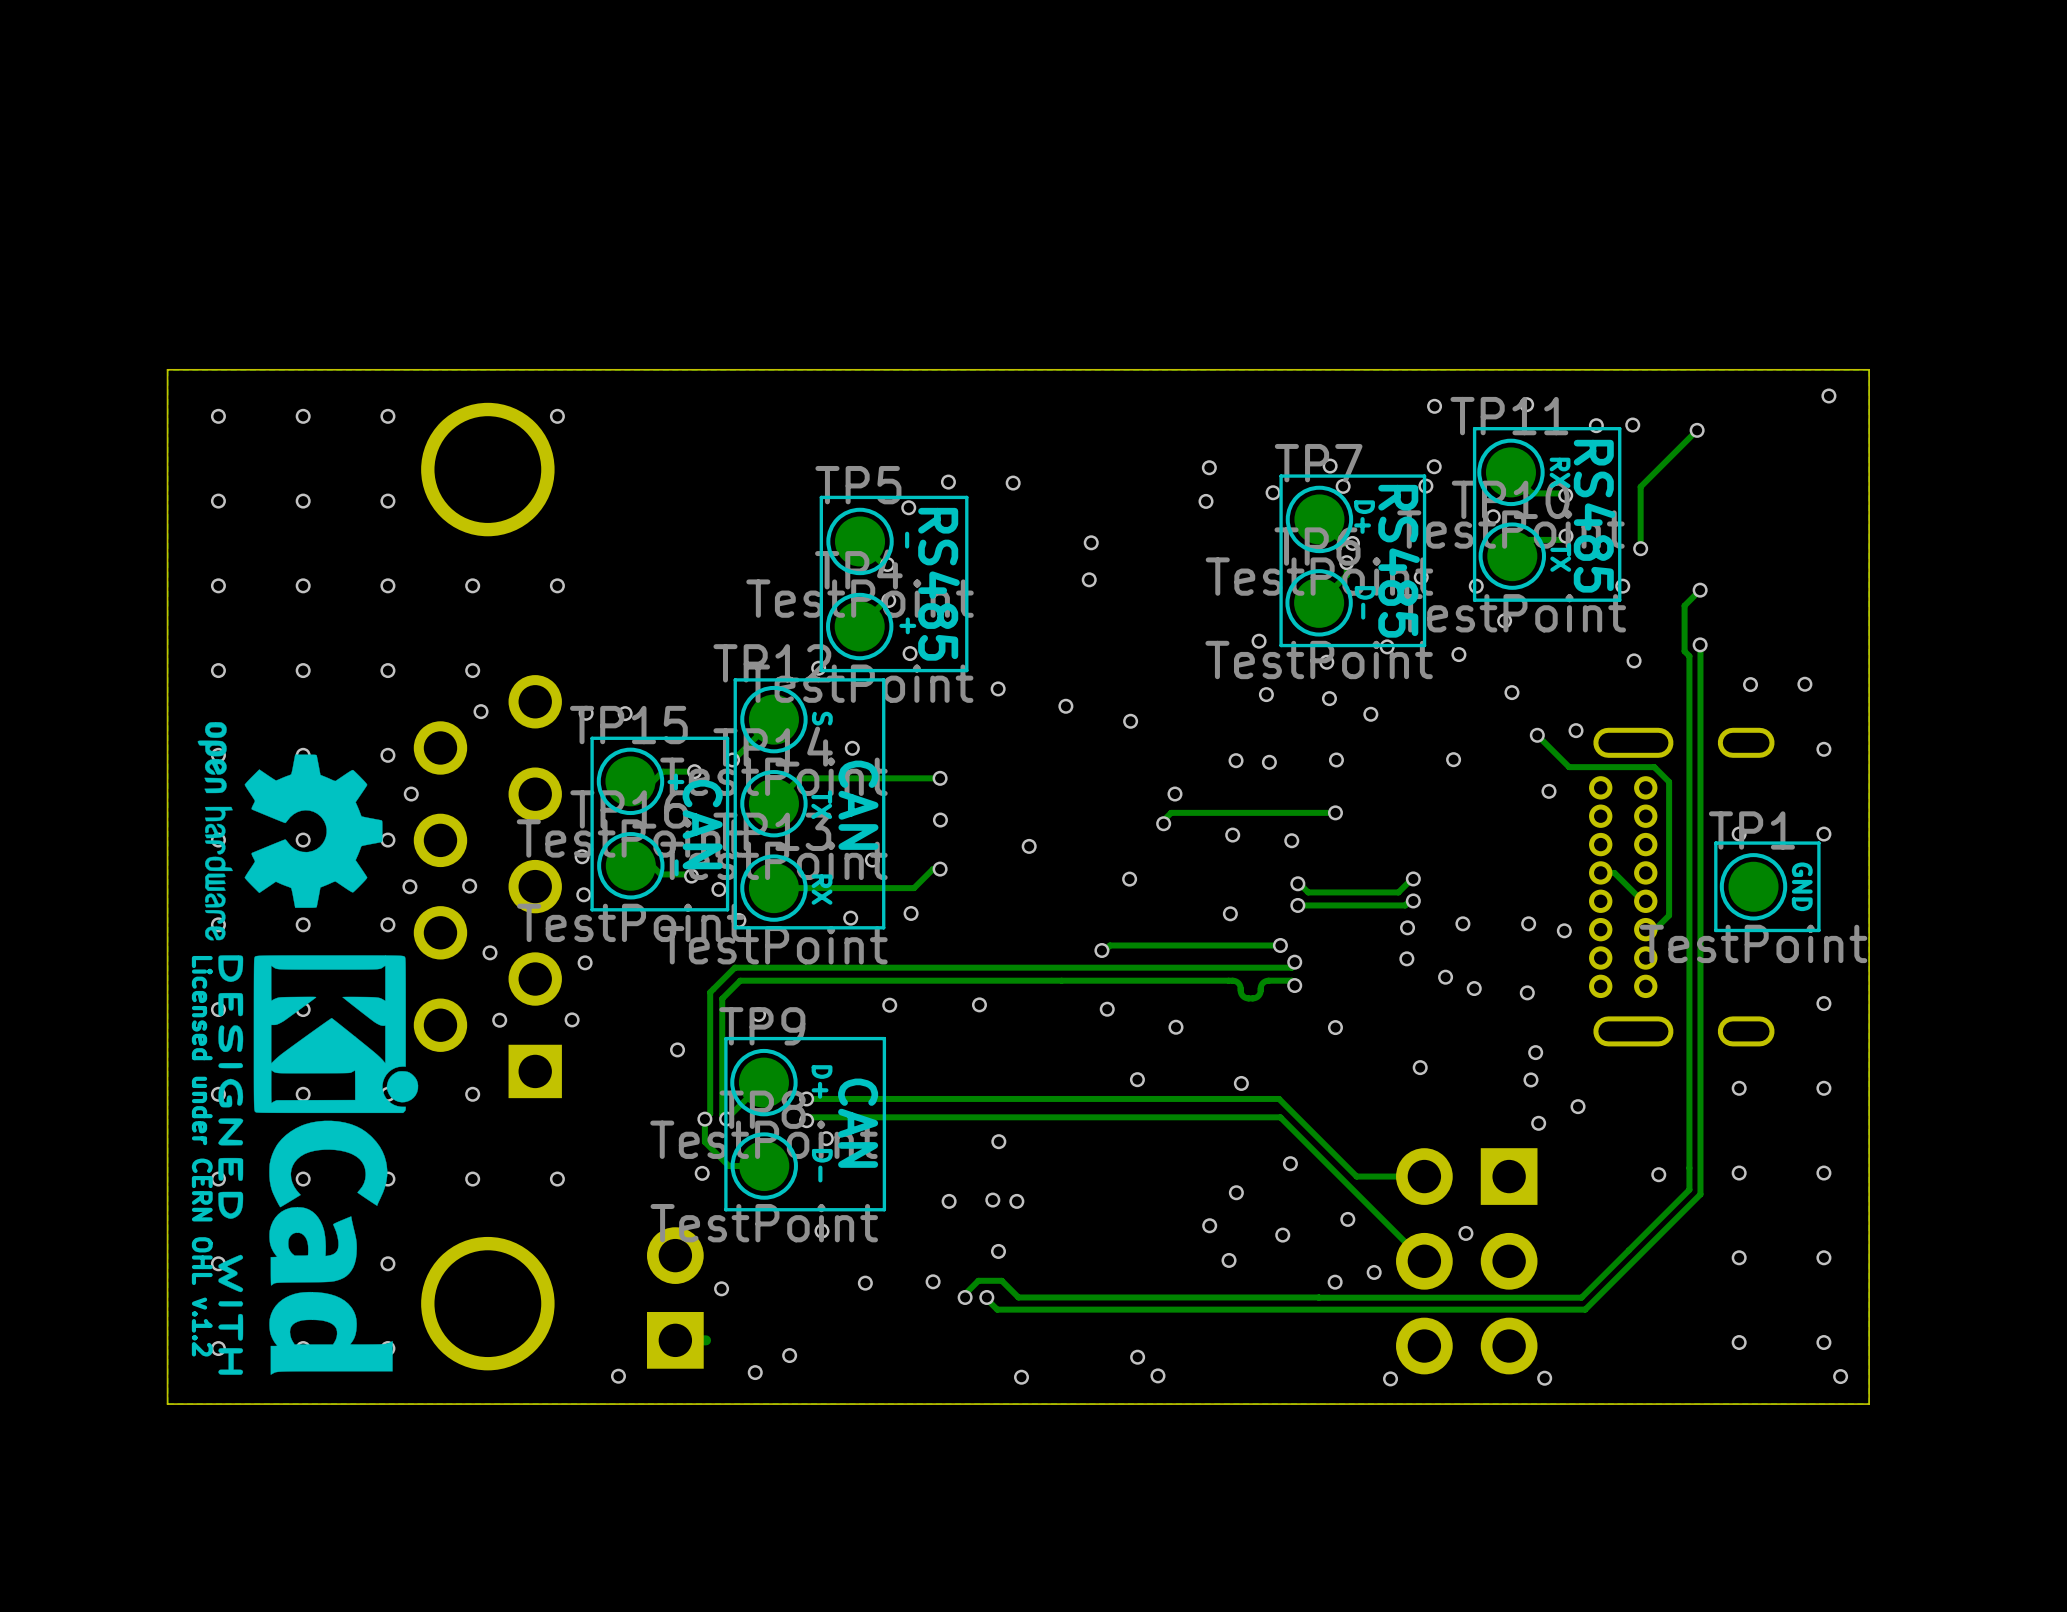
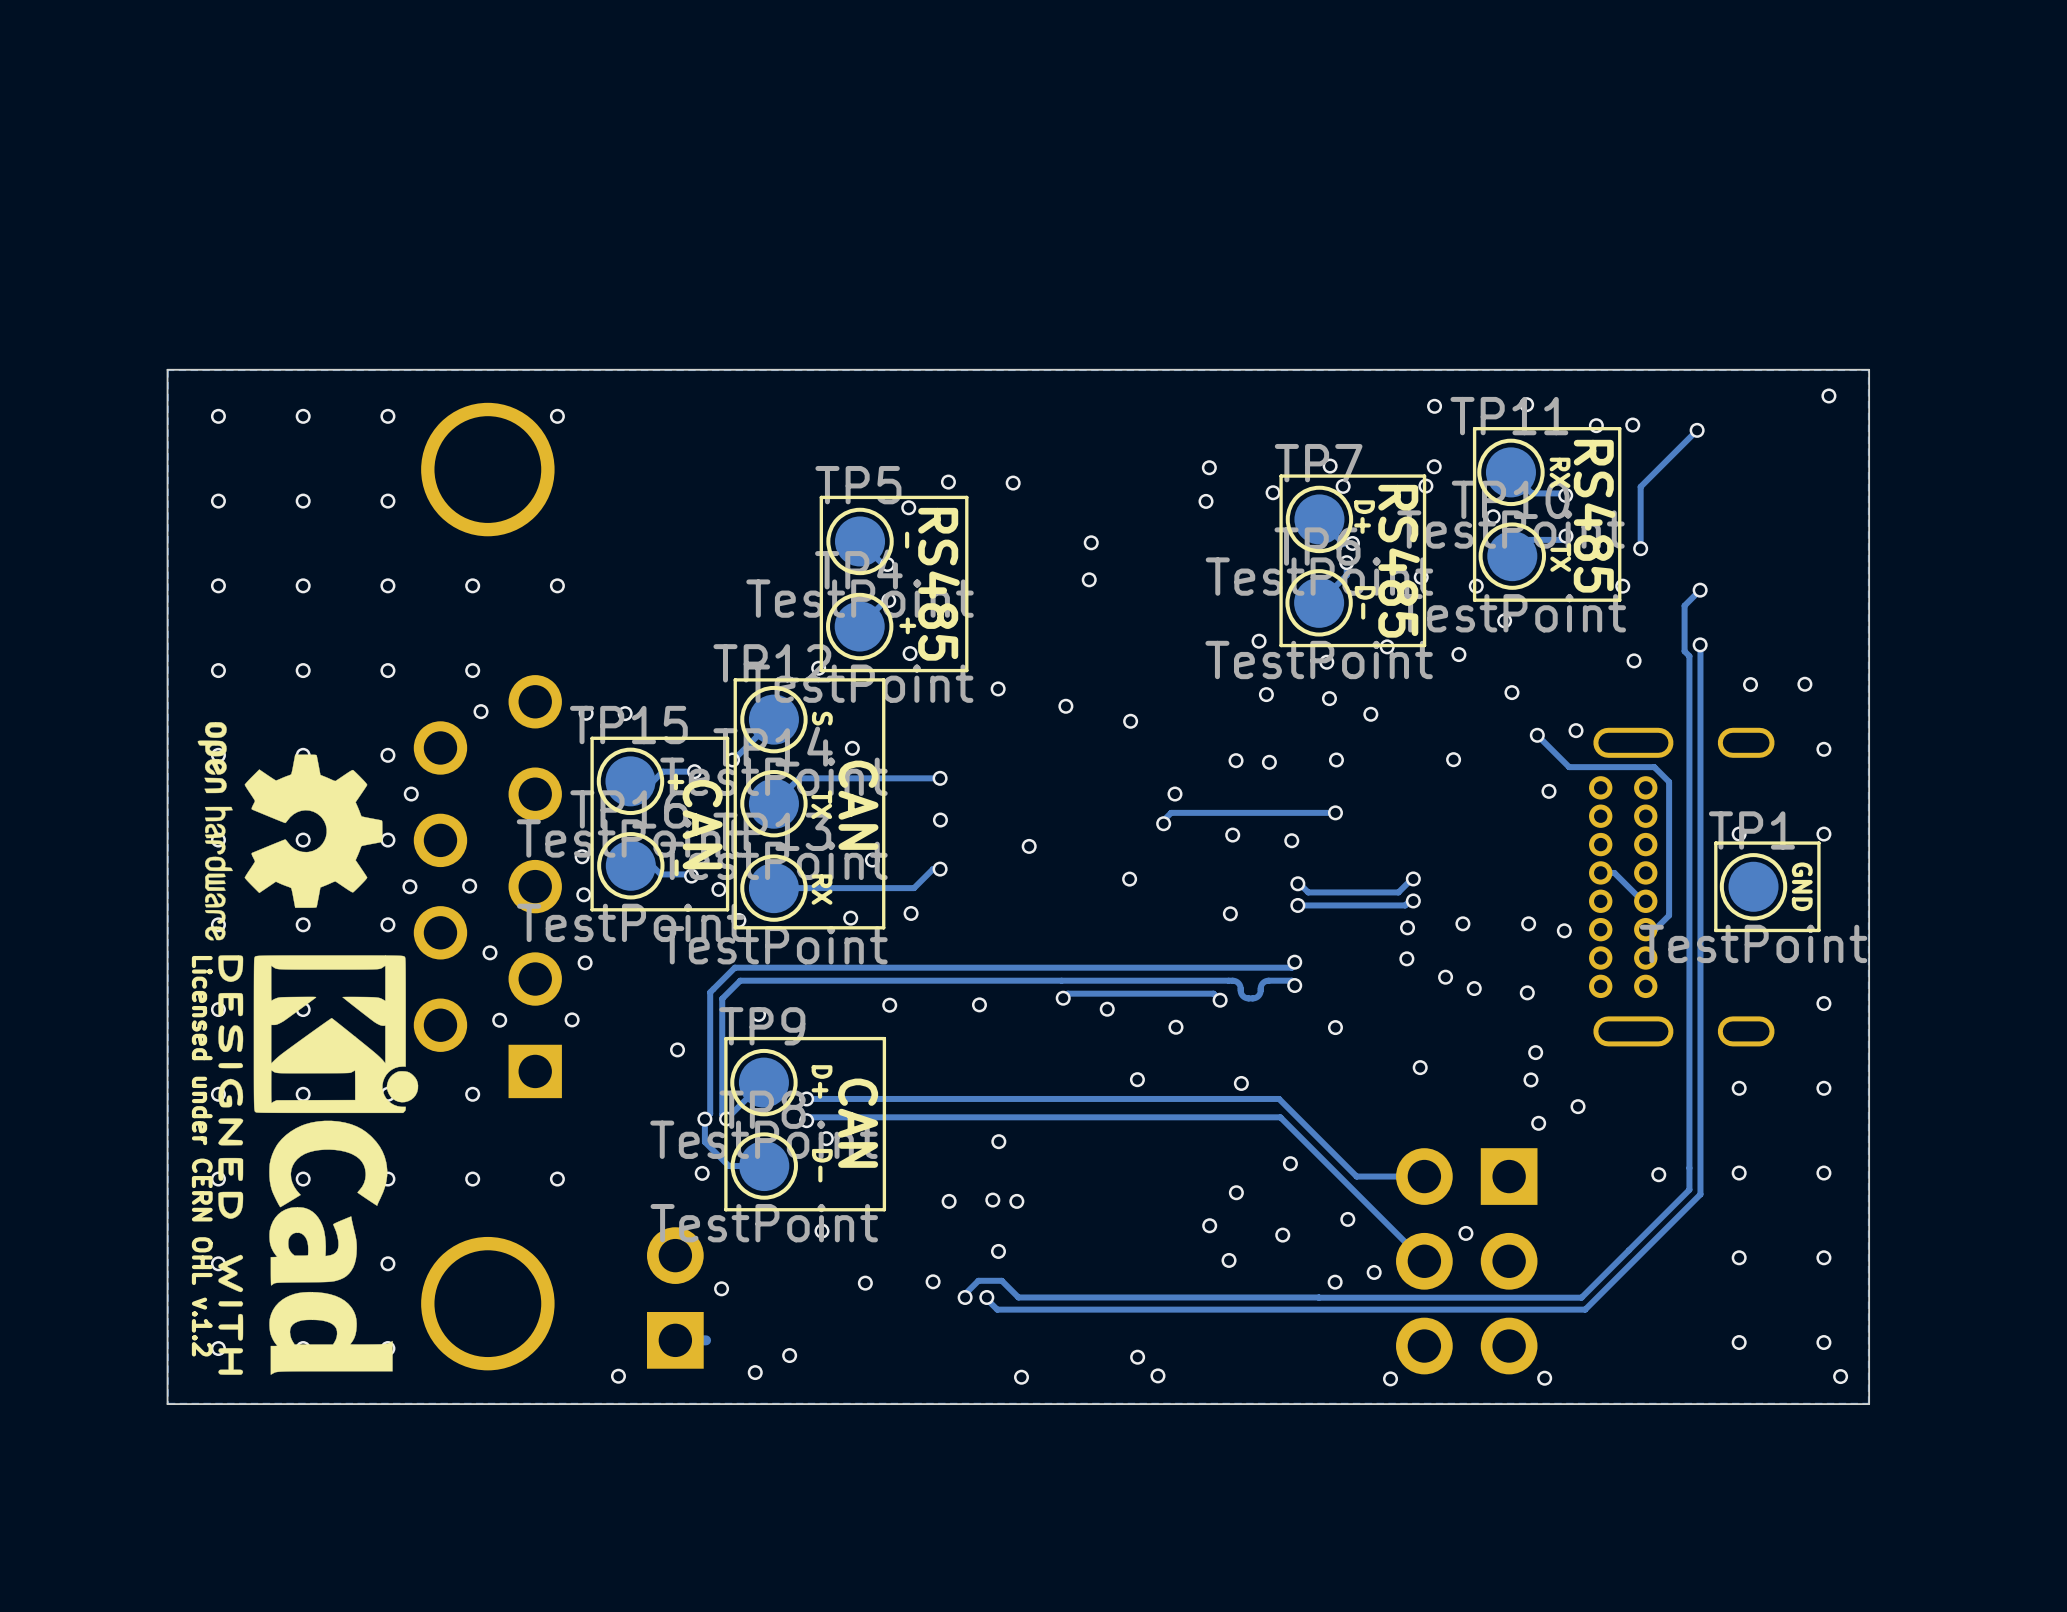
via: (1280, 945) -> none
track: (1282, 945) (1109, 945) (1101, 953) -> none
via position: (1101, 950) -> (1063, 998)
track: none -> (1063, 998) (1067, 993) (1213, 993) (1220, 1000)
via: none -> (1220, 1000)

